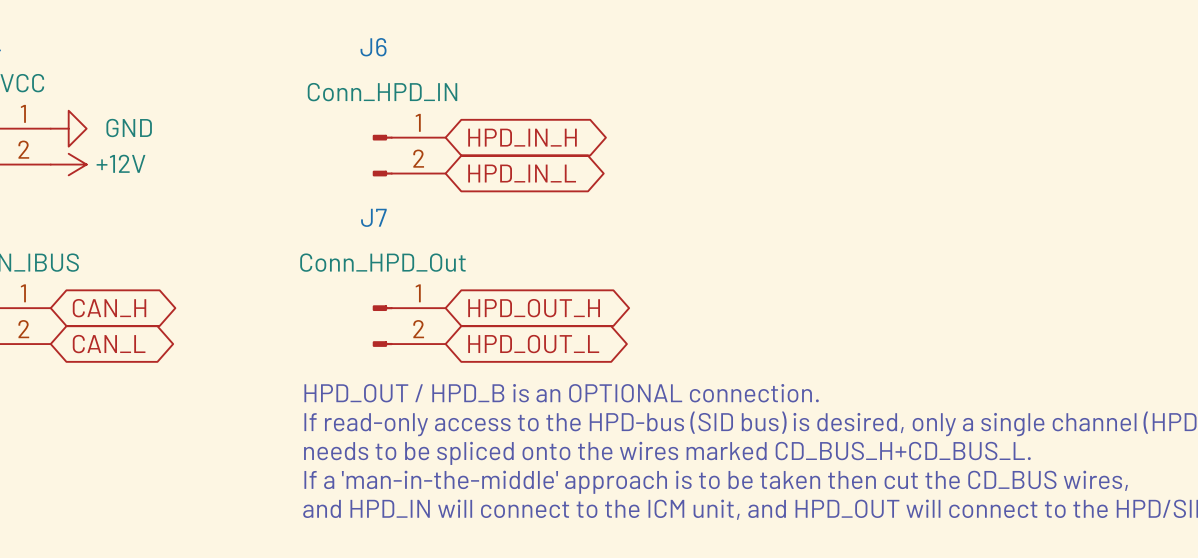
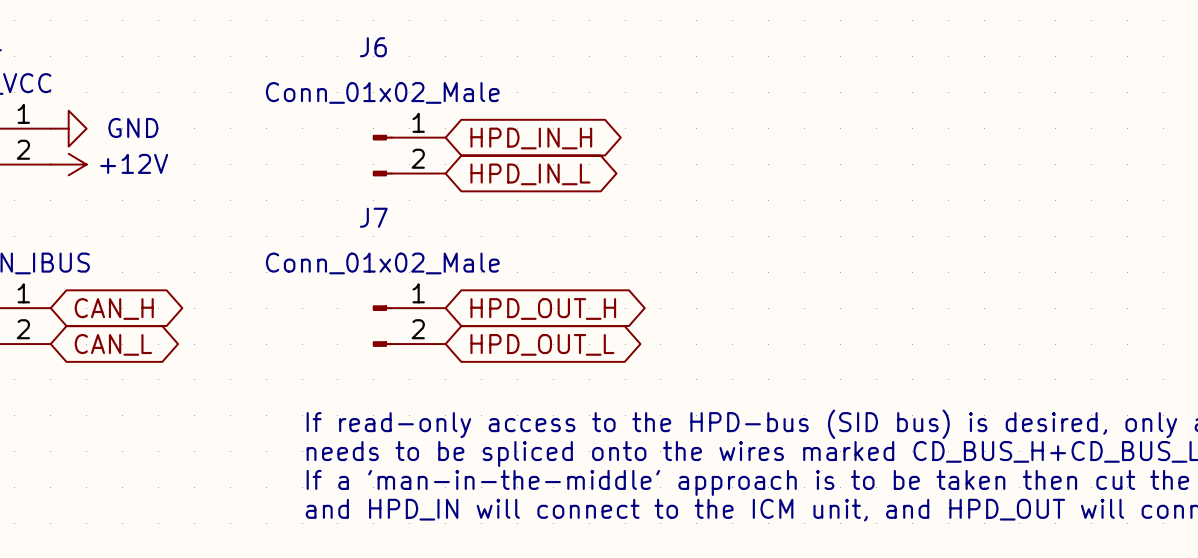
J6 value: Conn_HPD_IN (382, 92) -> Conn_01x02_Male (382, 92)
J7 value: Conn_HPD_Out (382, 262) -> Conn_01x02_Male (382, 263)
text: HPD_OUT / HPD_B is an OPTIONAL connection. (561, 393) -> none

